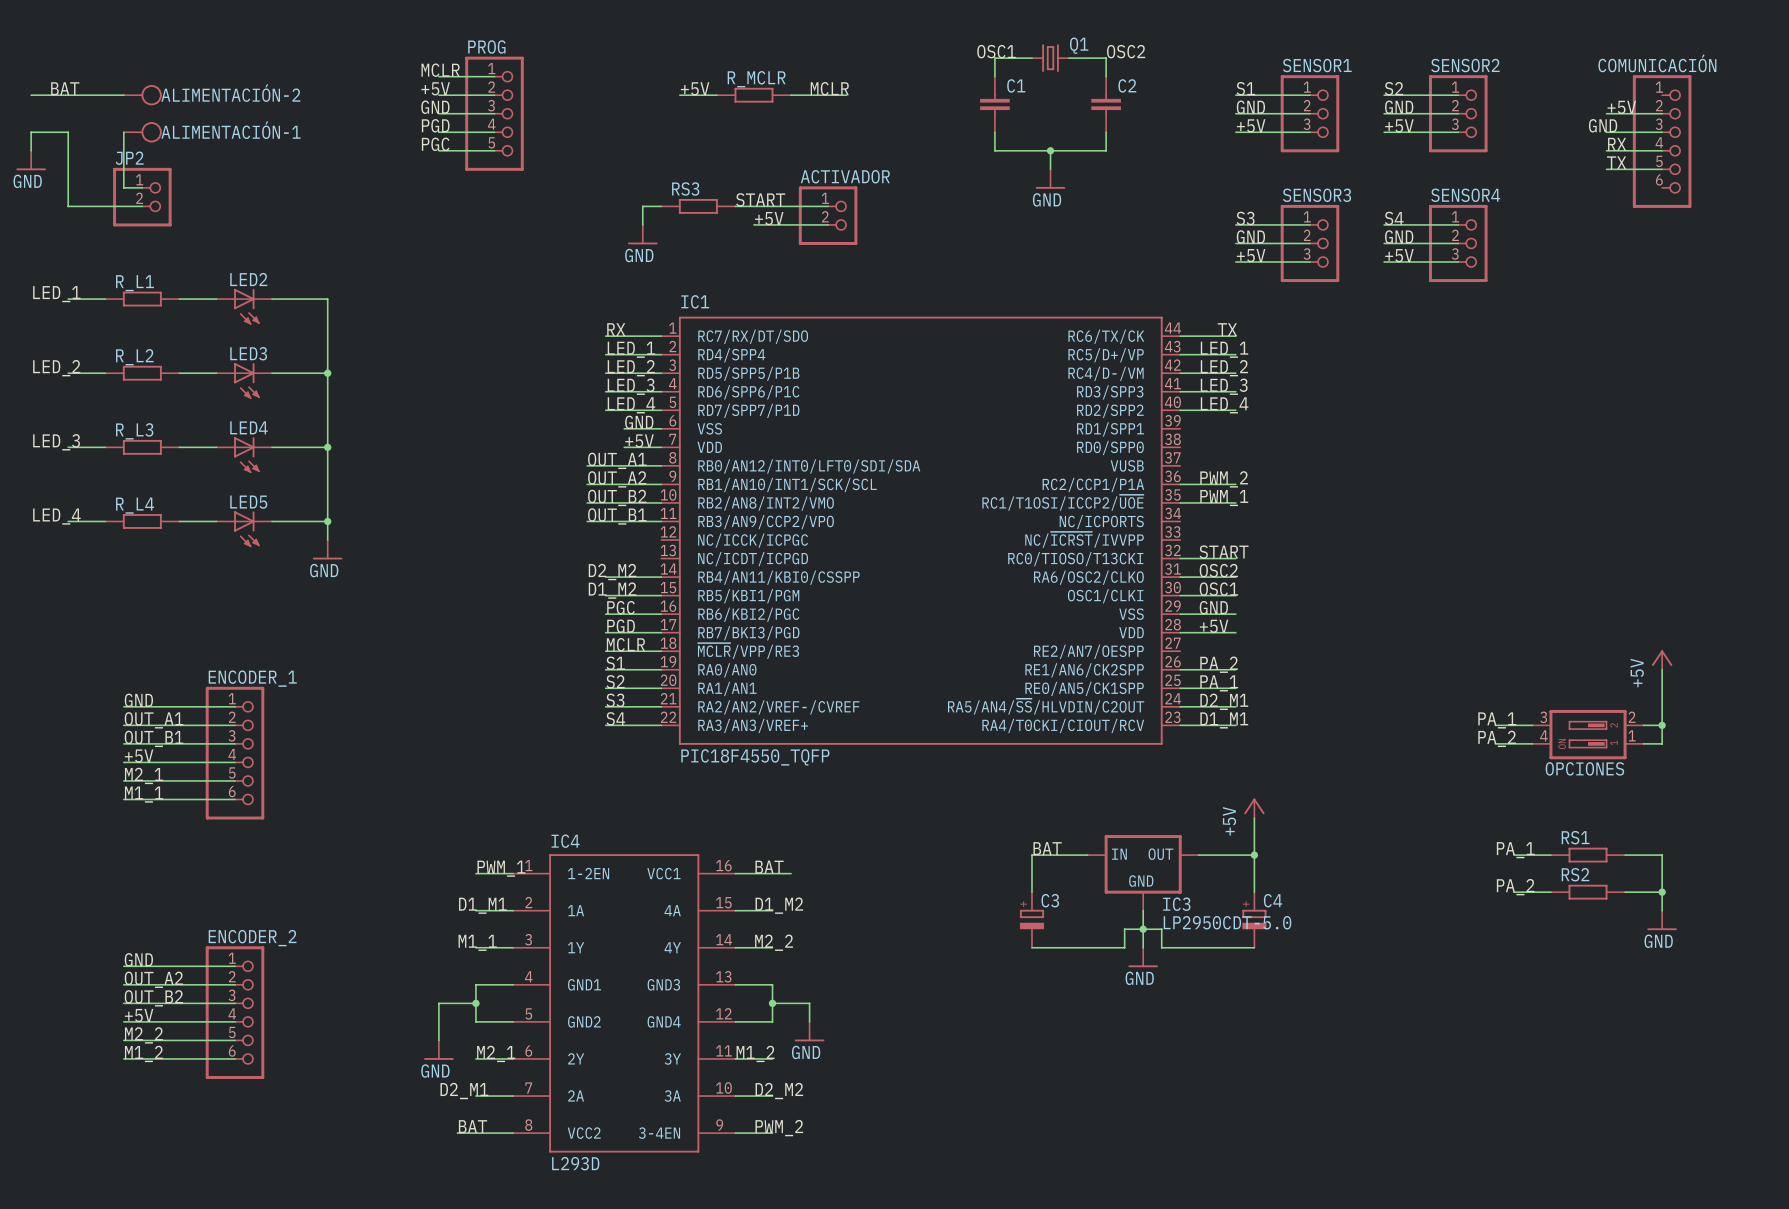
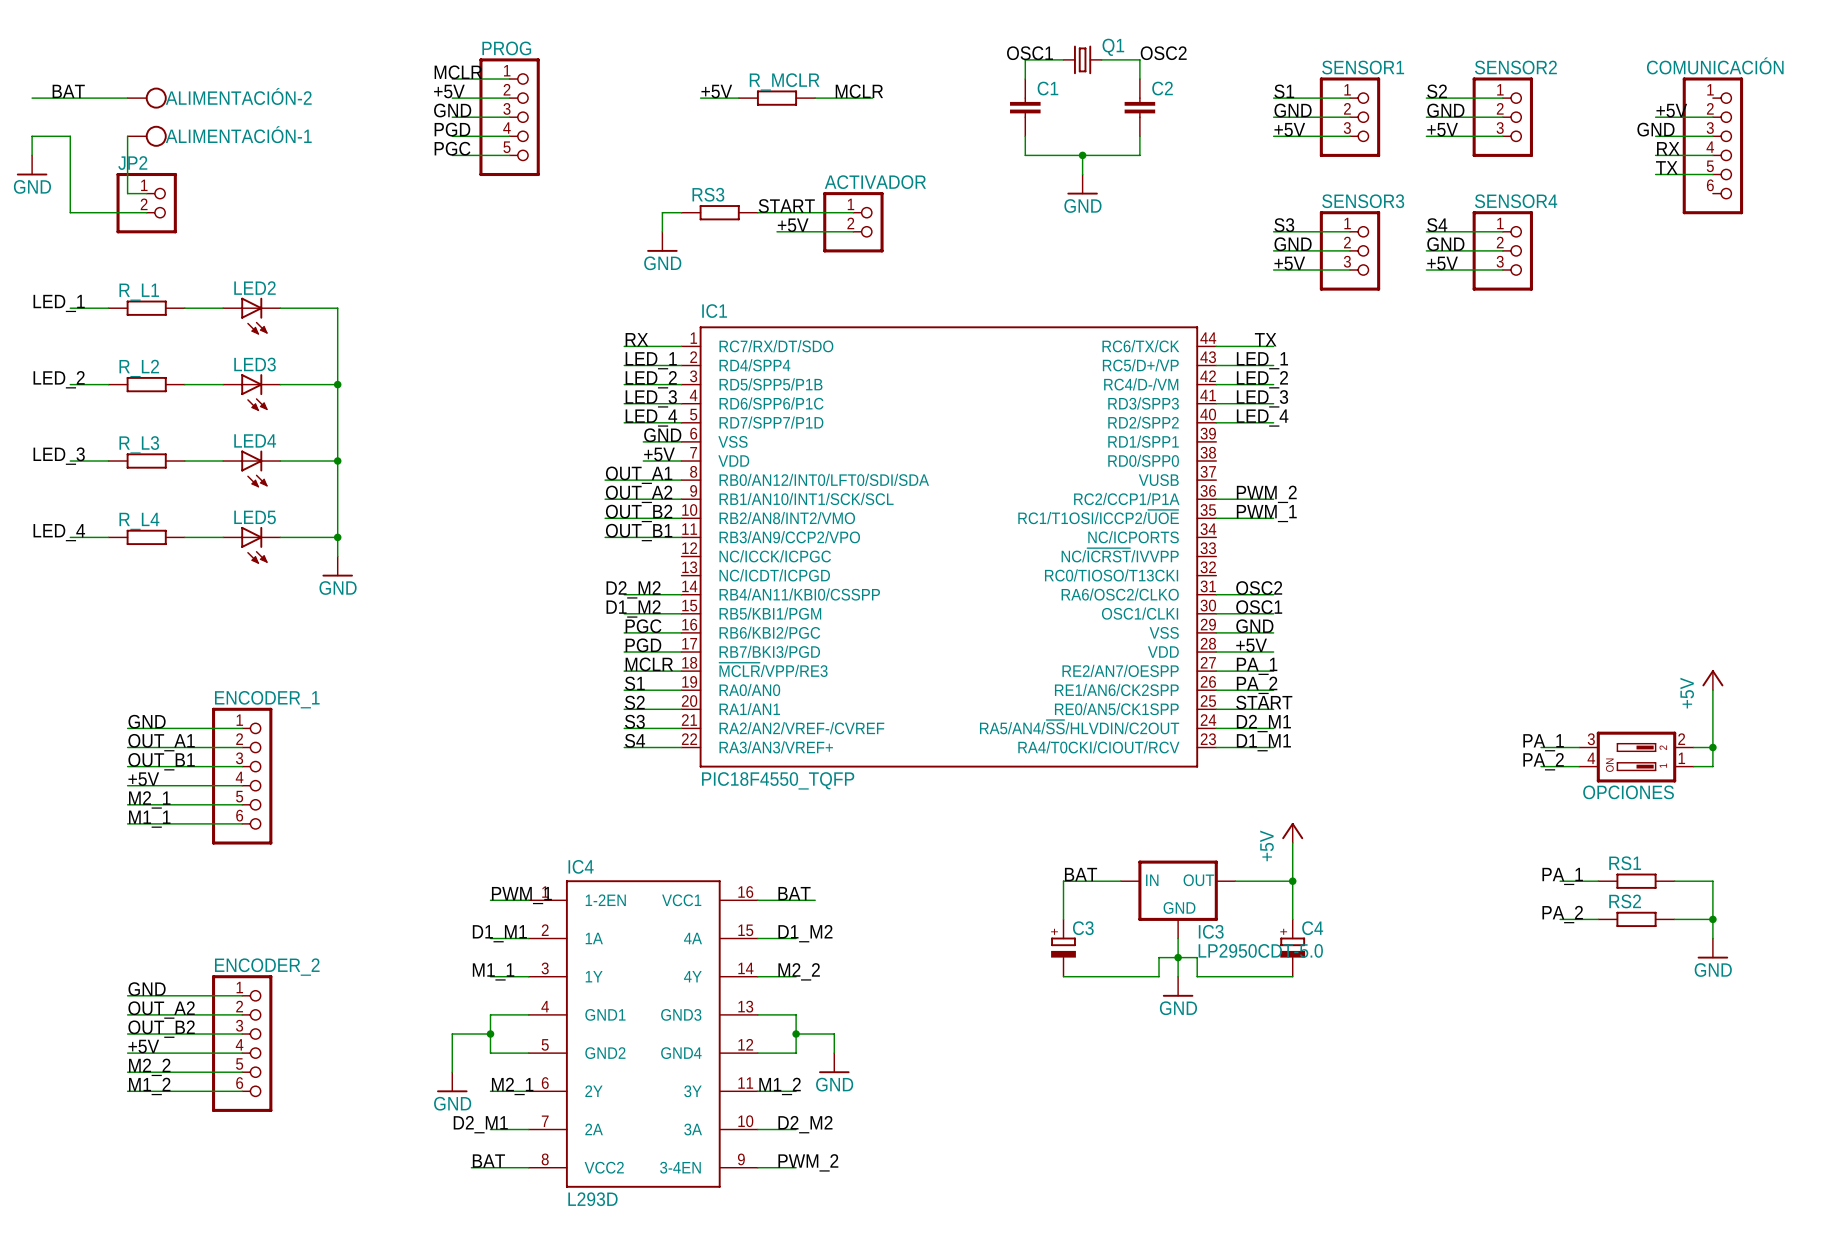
label: START (1224, 552) -> none
wire: (1180, 558) (1235, 558) -> (1216, 671) (1273, 671)
label: none -> PA_1 (1257, 666)
label: PA_1 (1219, 683) -> START (1264, 702)

